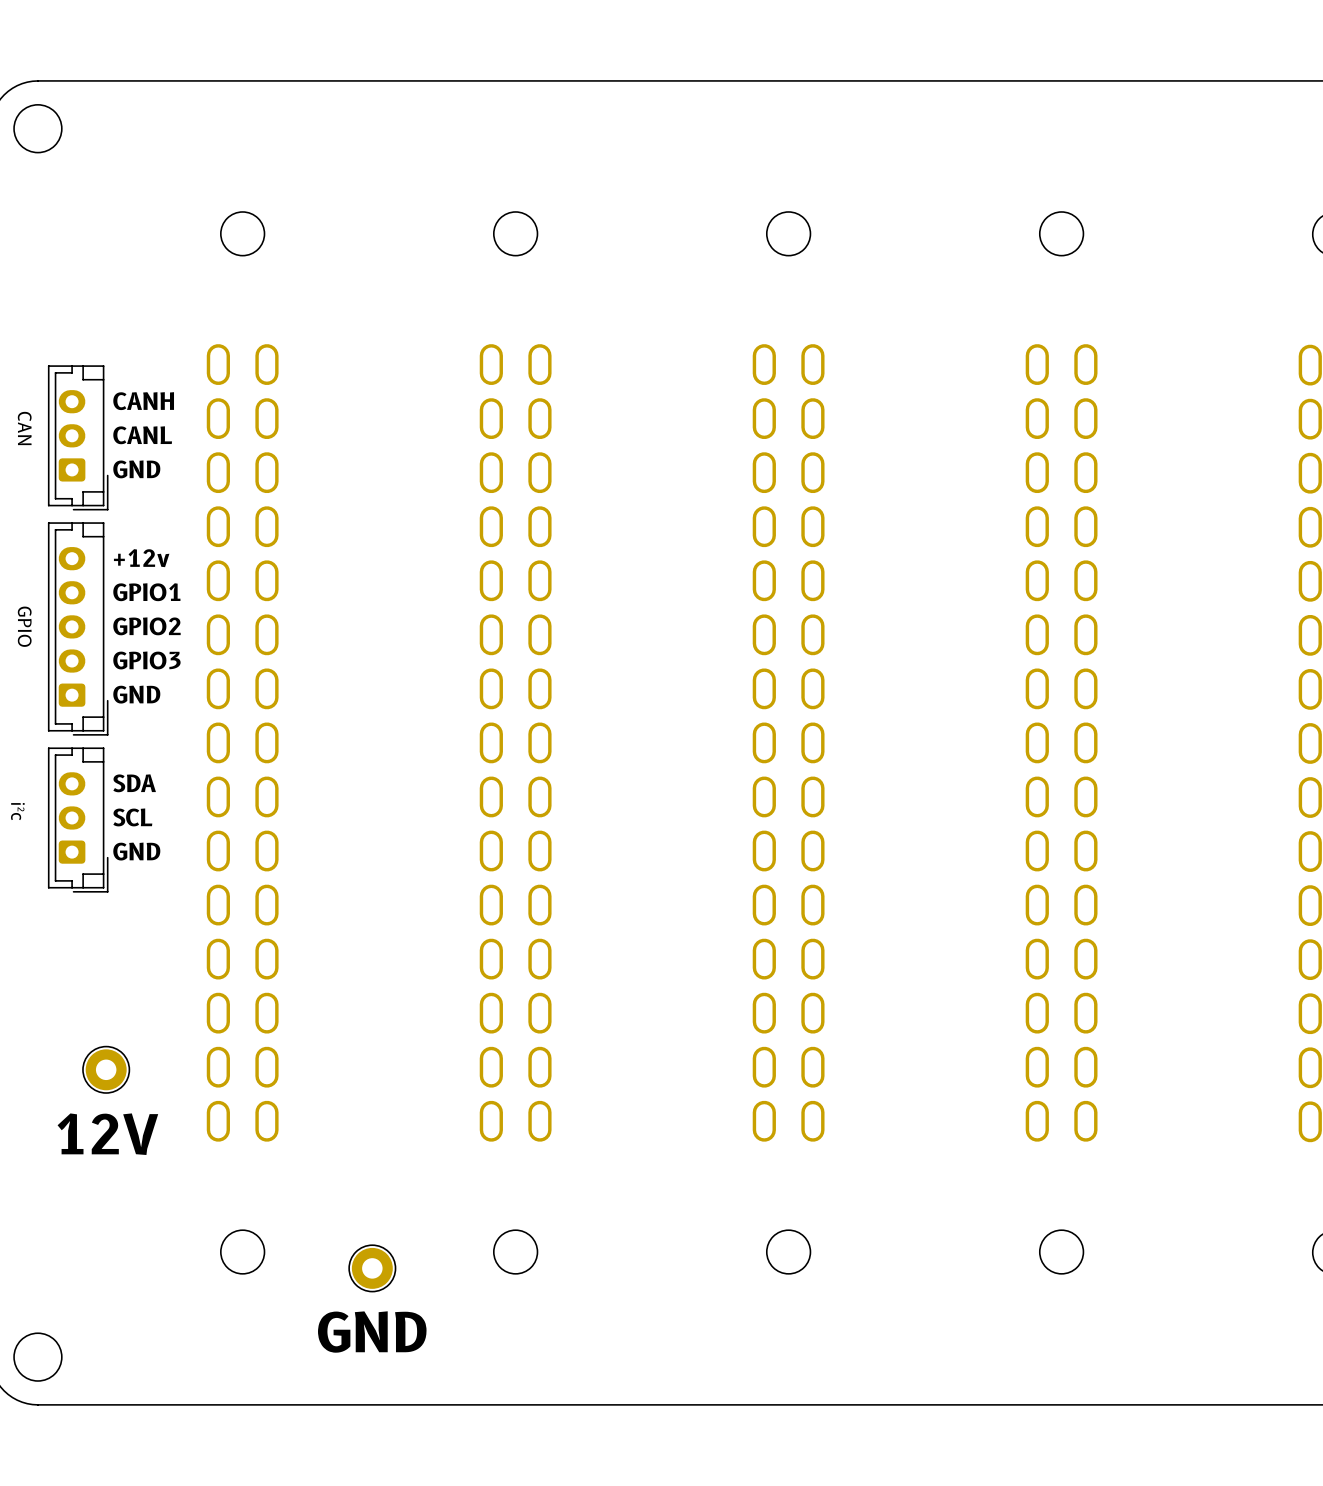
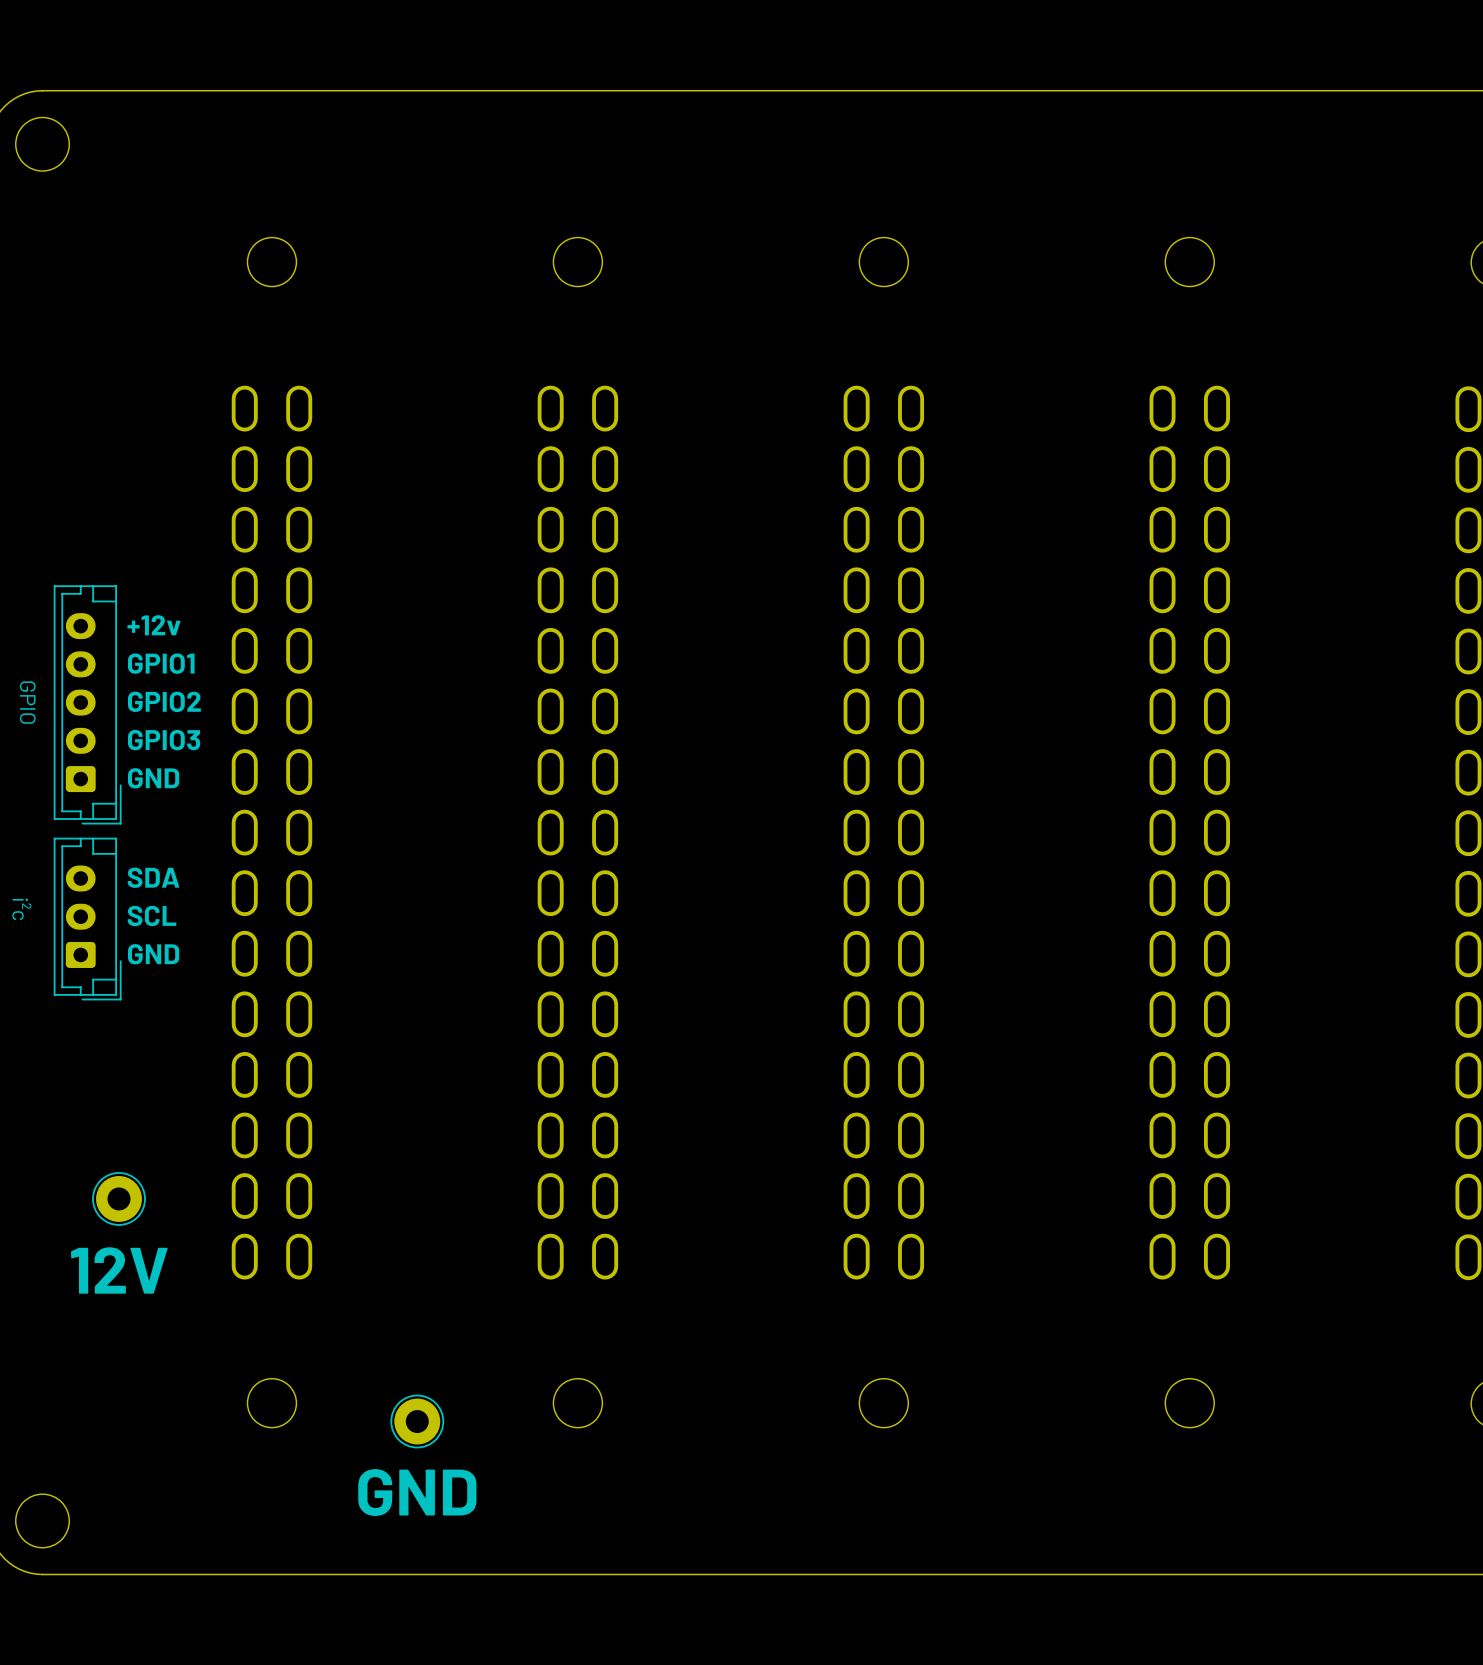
text: CANH (143, 401) -> none
text: CANL (142, 435) -> none
part: CAN (78, 437) -> none
text: GND (136, 469) -> none

